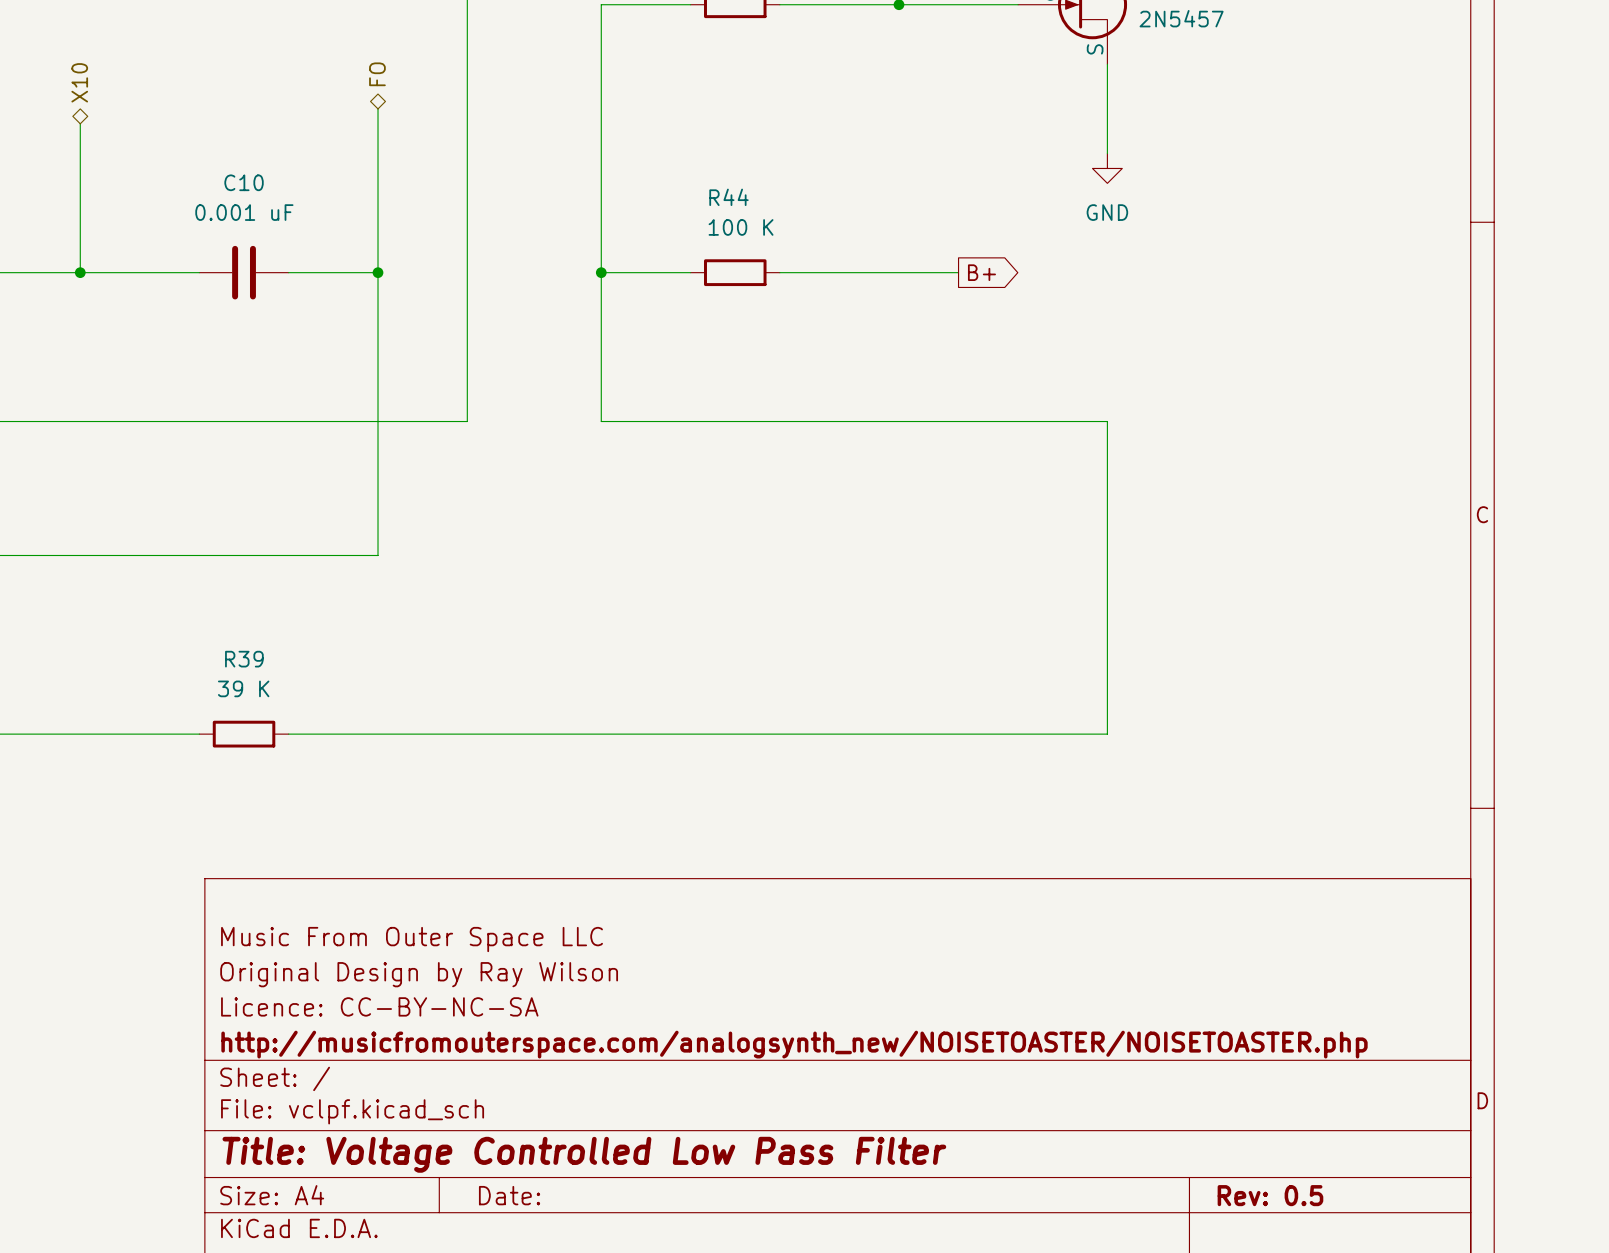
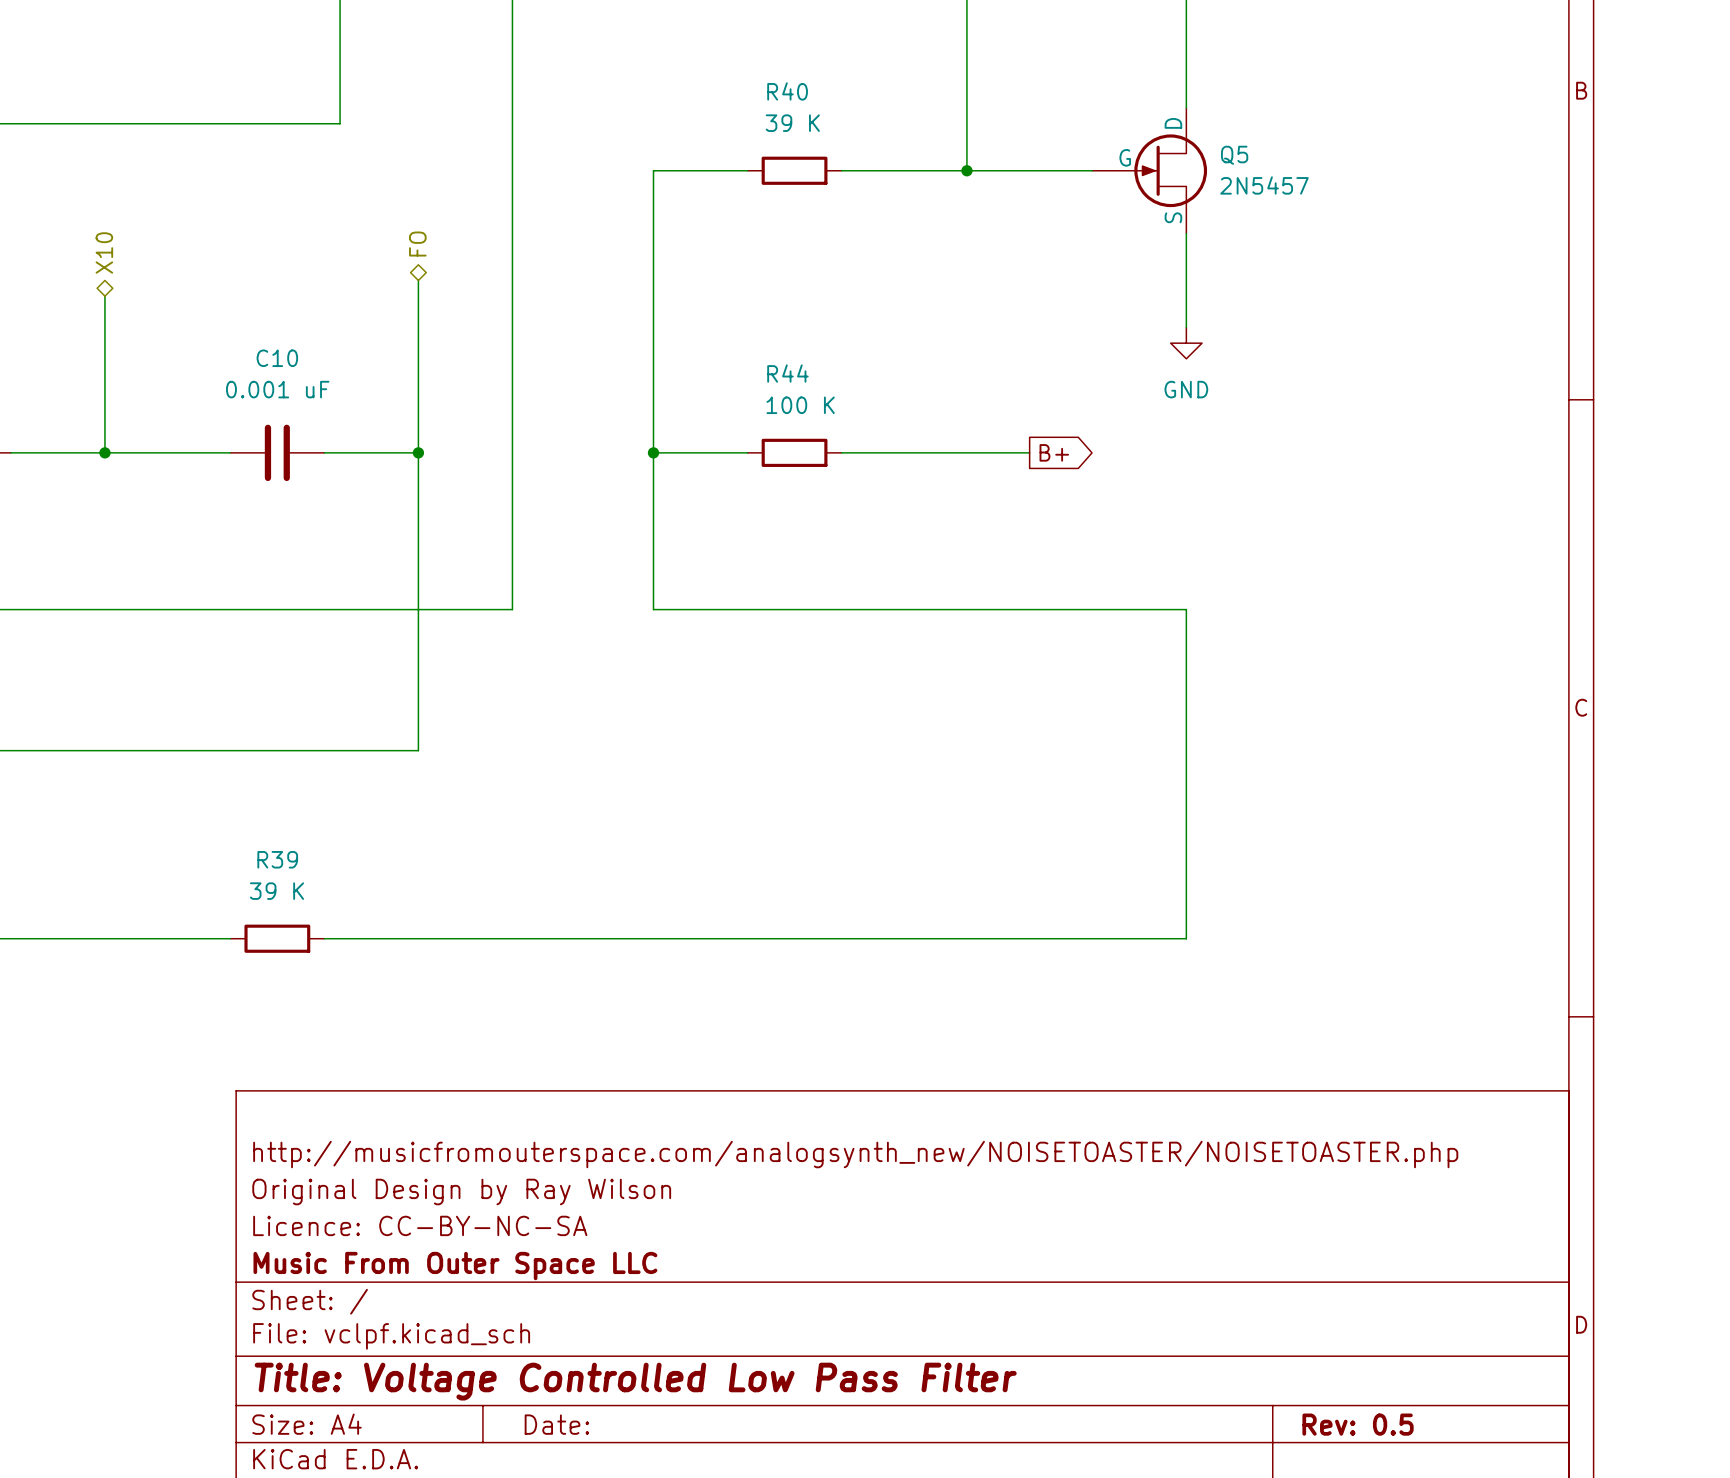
title block: Music From Outer Space LLC (412, 939) -> http://musicfromouterspace.com/analogsynth_new/NOISETOASTER/NOISETOASTER.php (855, 1154)
title block: http://musicfromouterspace.com/analogsynth_new/NOISETOASTER/NOISETOASTER.php (794, 1044) -> Music From Outer Space LLC (455, 1266)

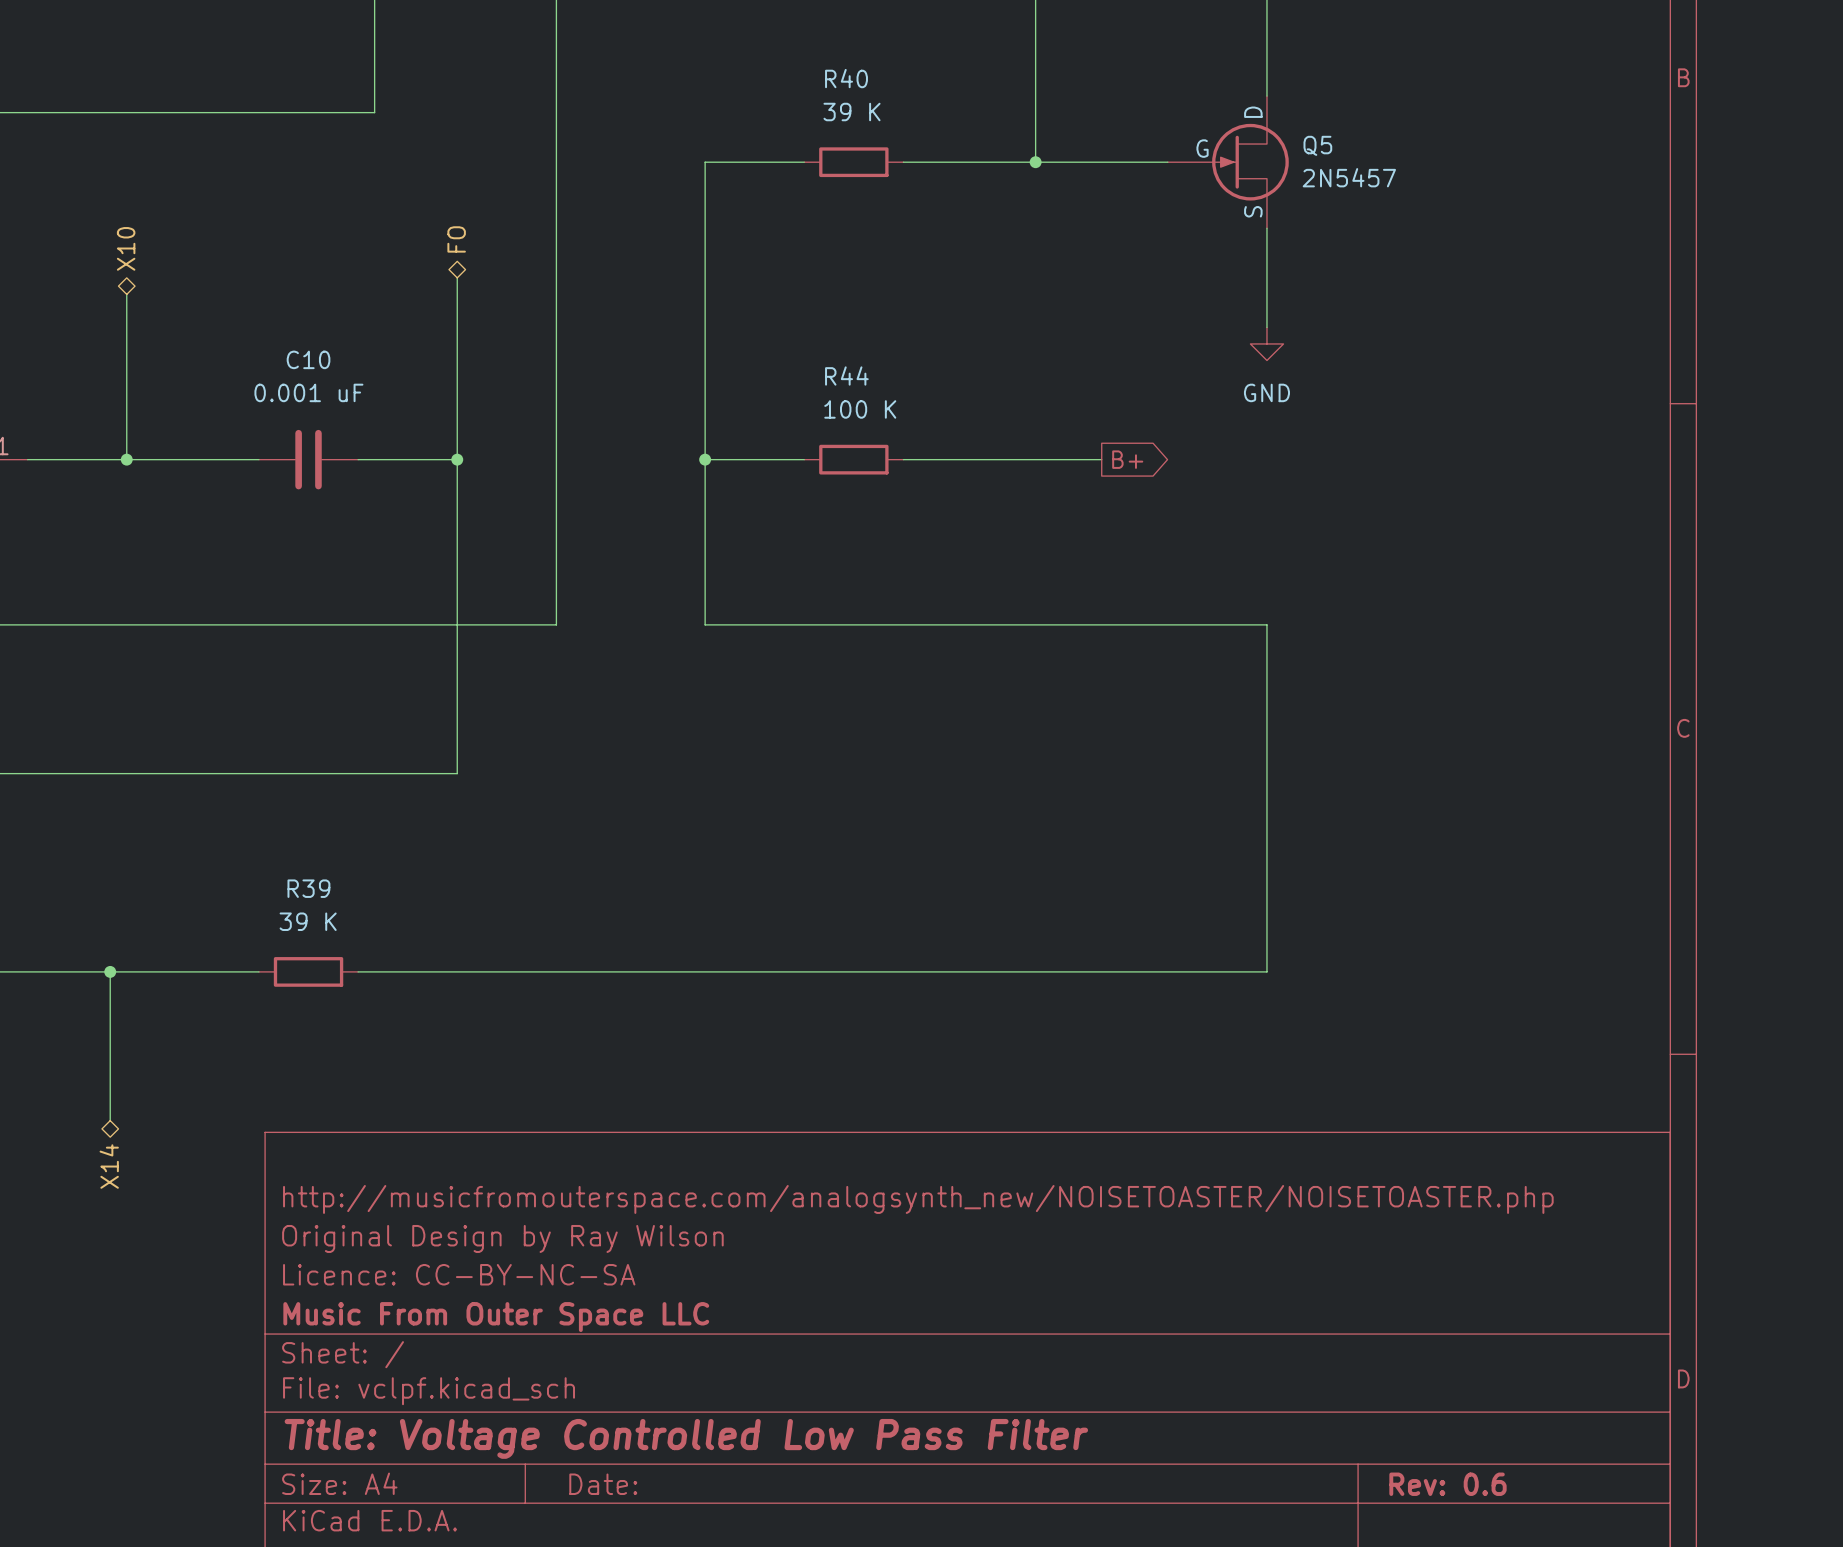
wire: none -> (110, 971) (110, 1120)
junction: none -> (110, 971)
hierarchical label: none -> X14 (109, 1166)
title block: Rev: 0.5 (1358, 1424) -> Rev: 0.6 (1447, 1484)

